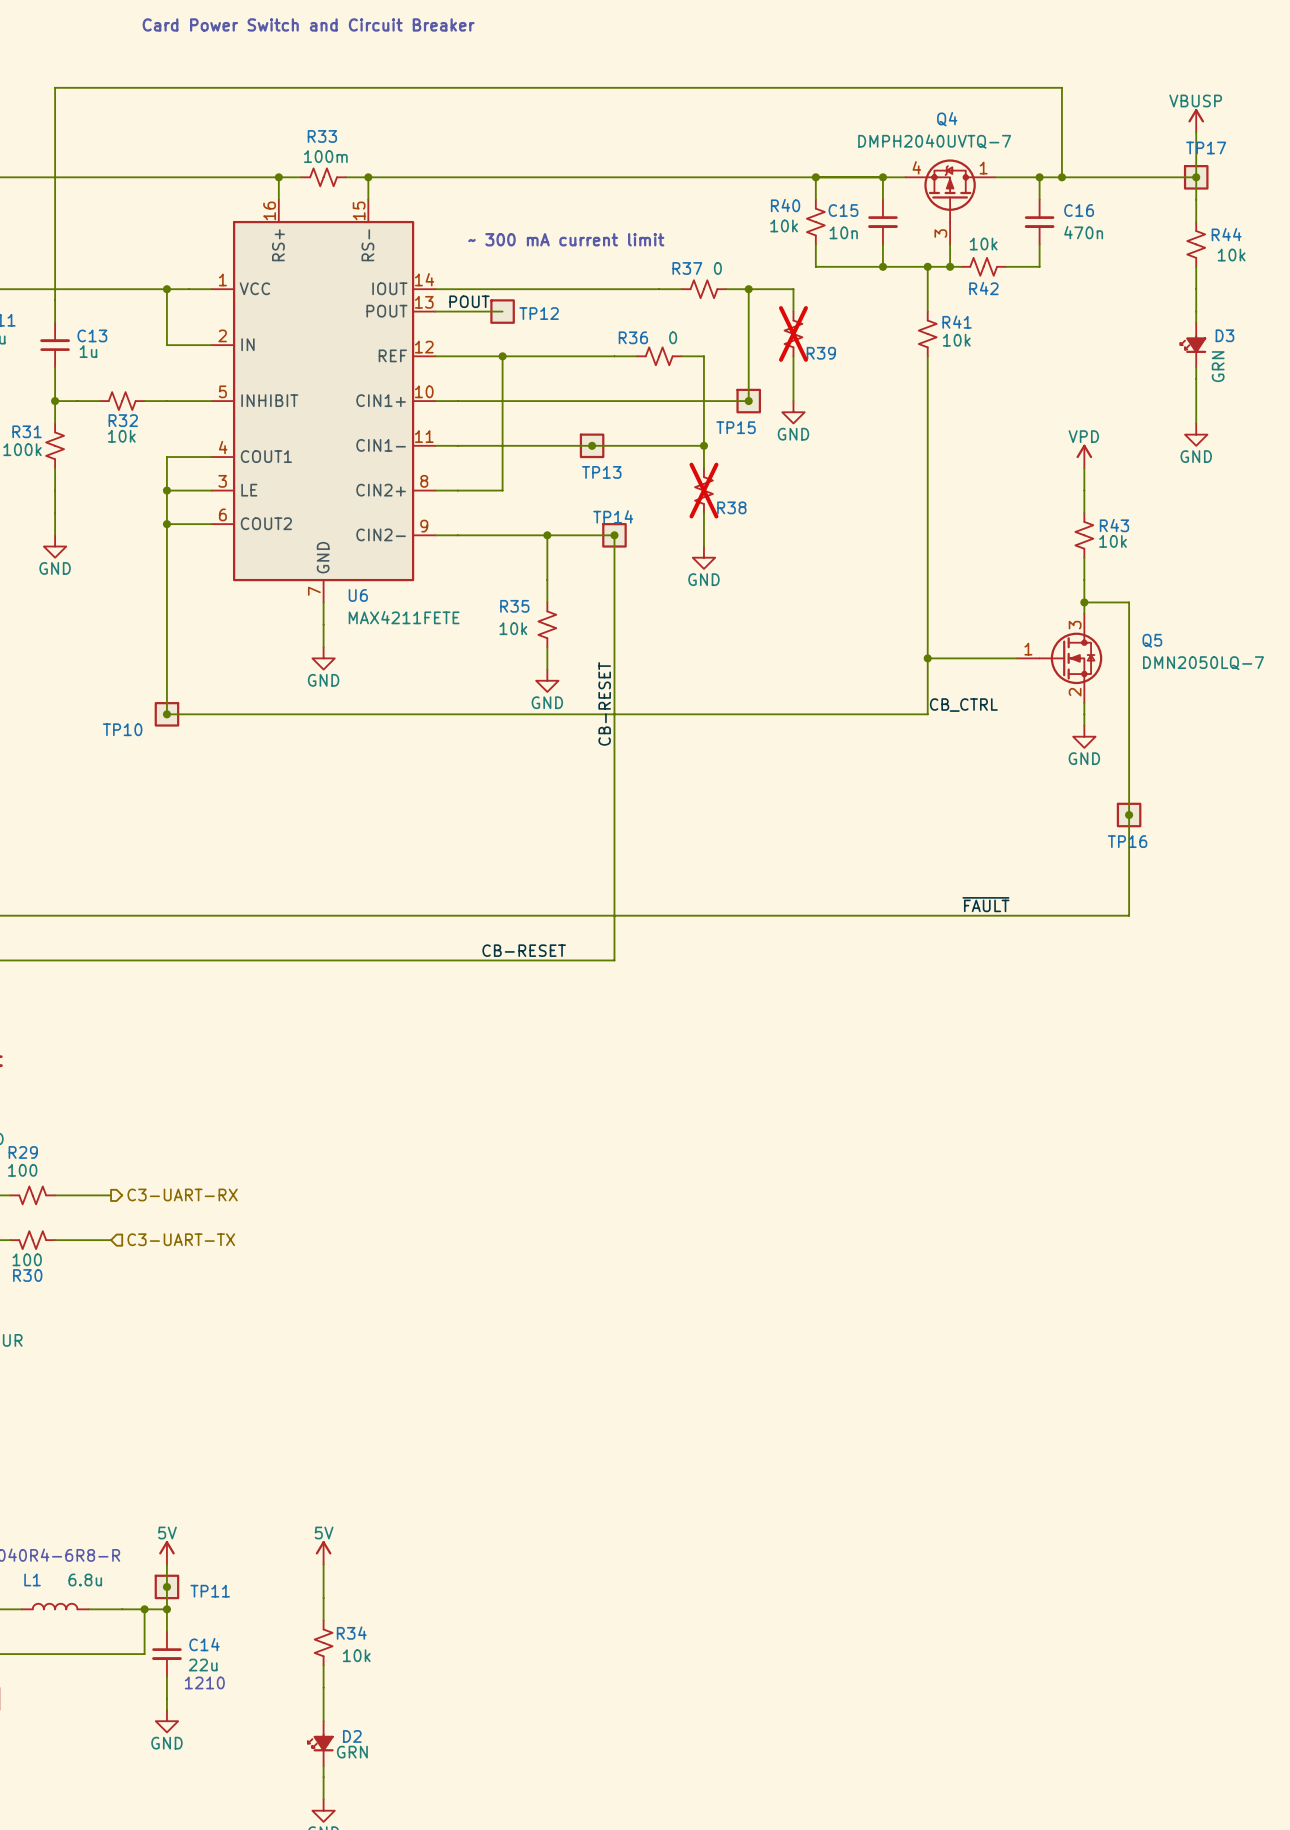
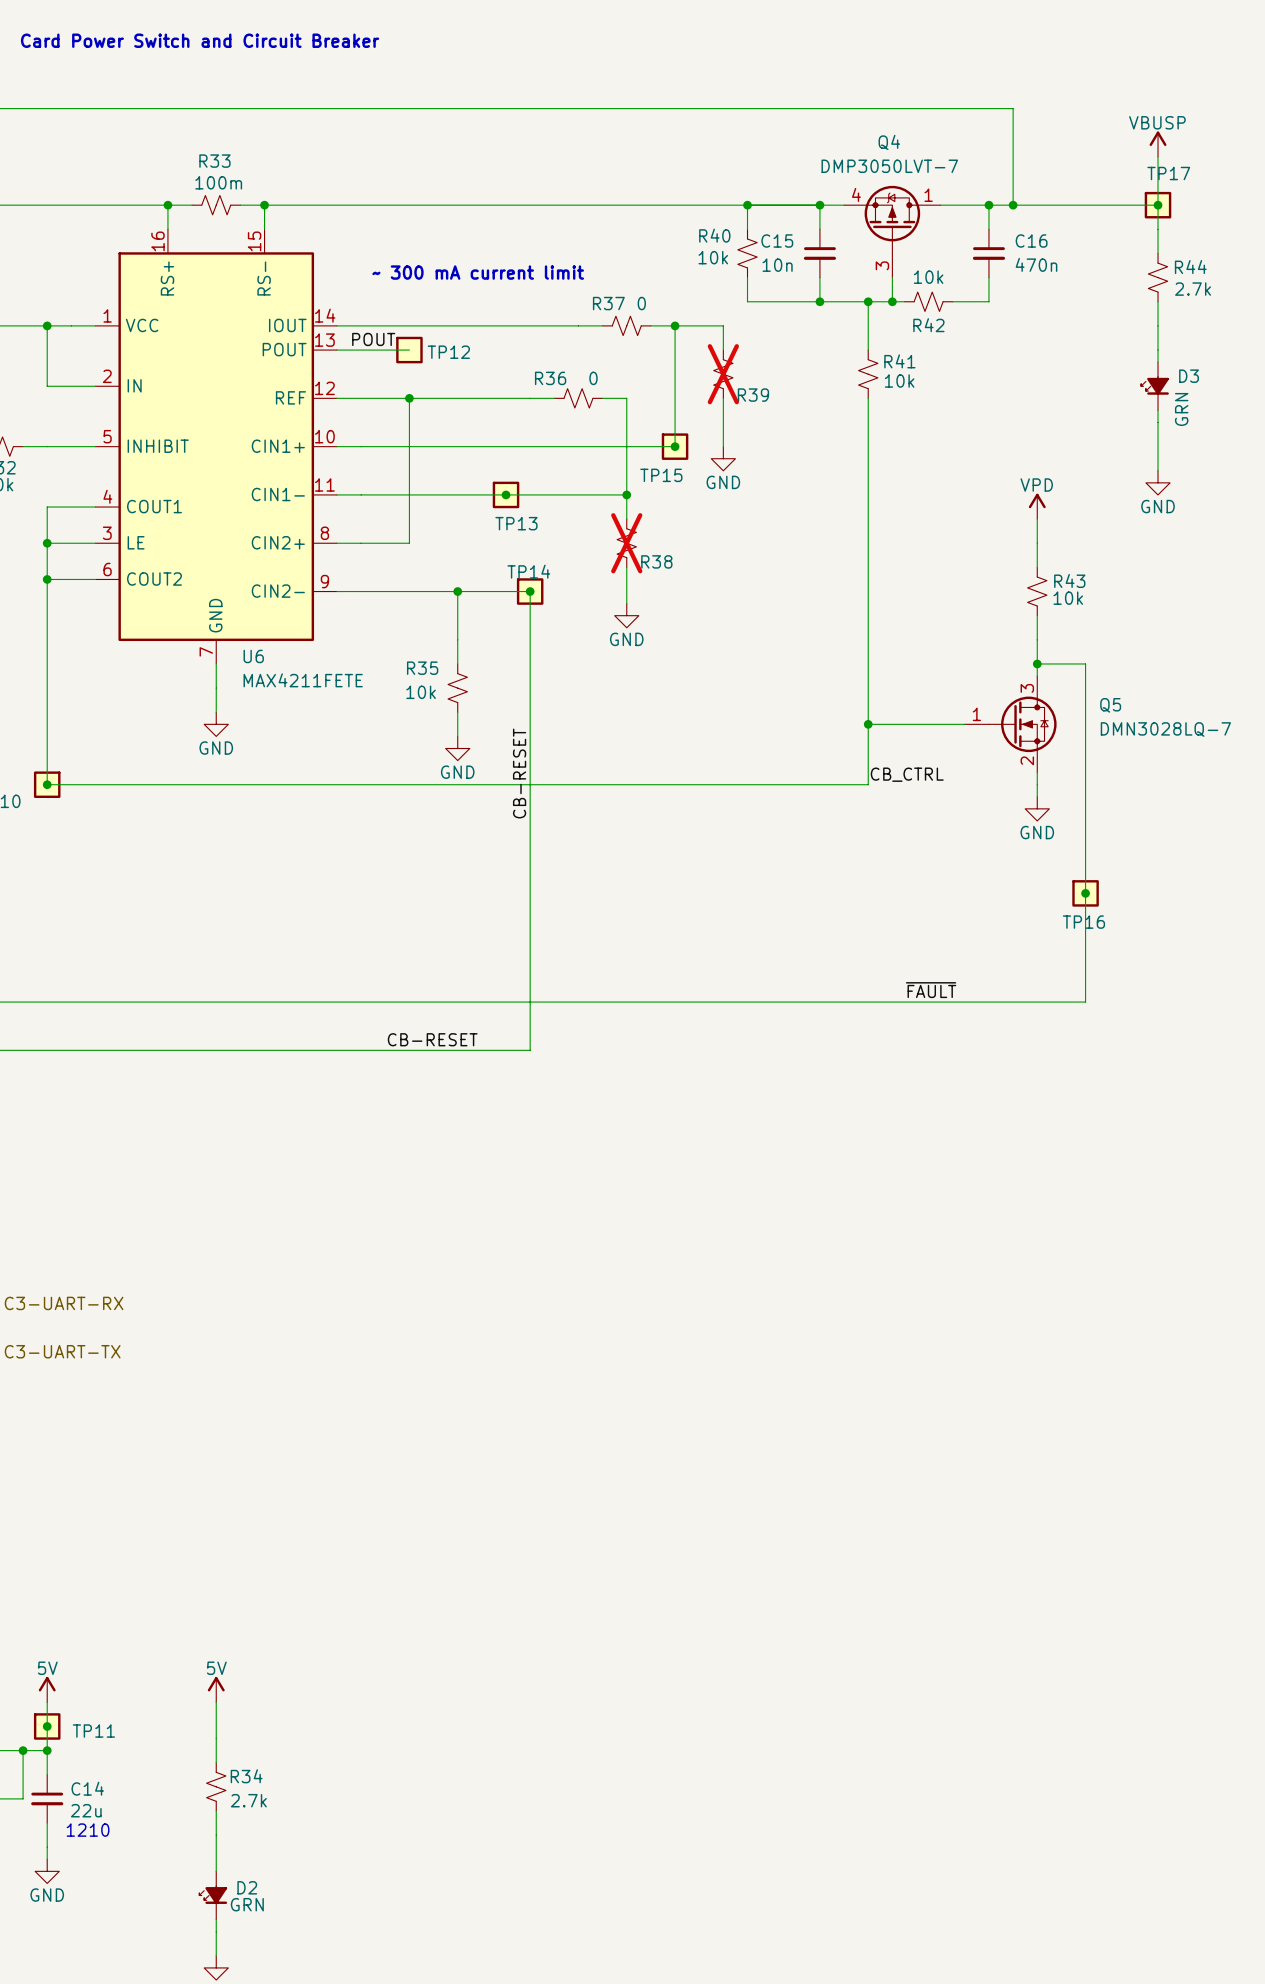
Q4 value: DMPH2040UVTQ-7 (934, 141) -> DMP3050LVT-7 (889, 166)
R44 value: 10k (1231, 255) -> 2.7k (1193, 289)
Q5 value: DMN2050LQ-7 (1203, 663) -> DMN3028LQ-7 (1165, 729)
R34 value: 10k (356, 1655) -> 2.7k (248, 1800)

